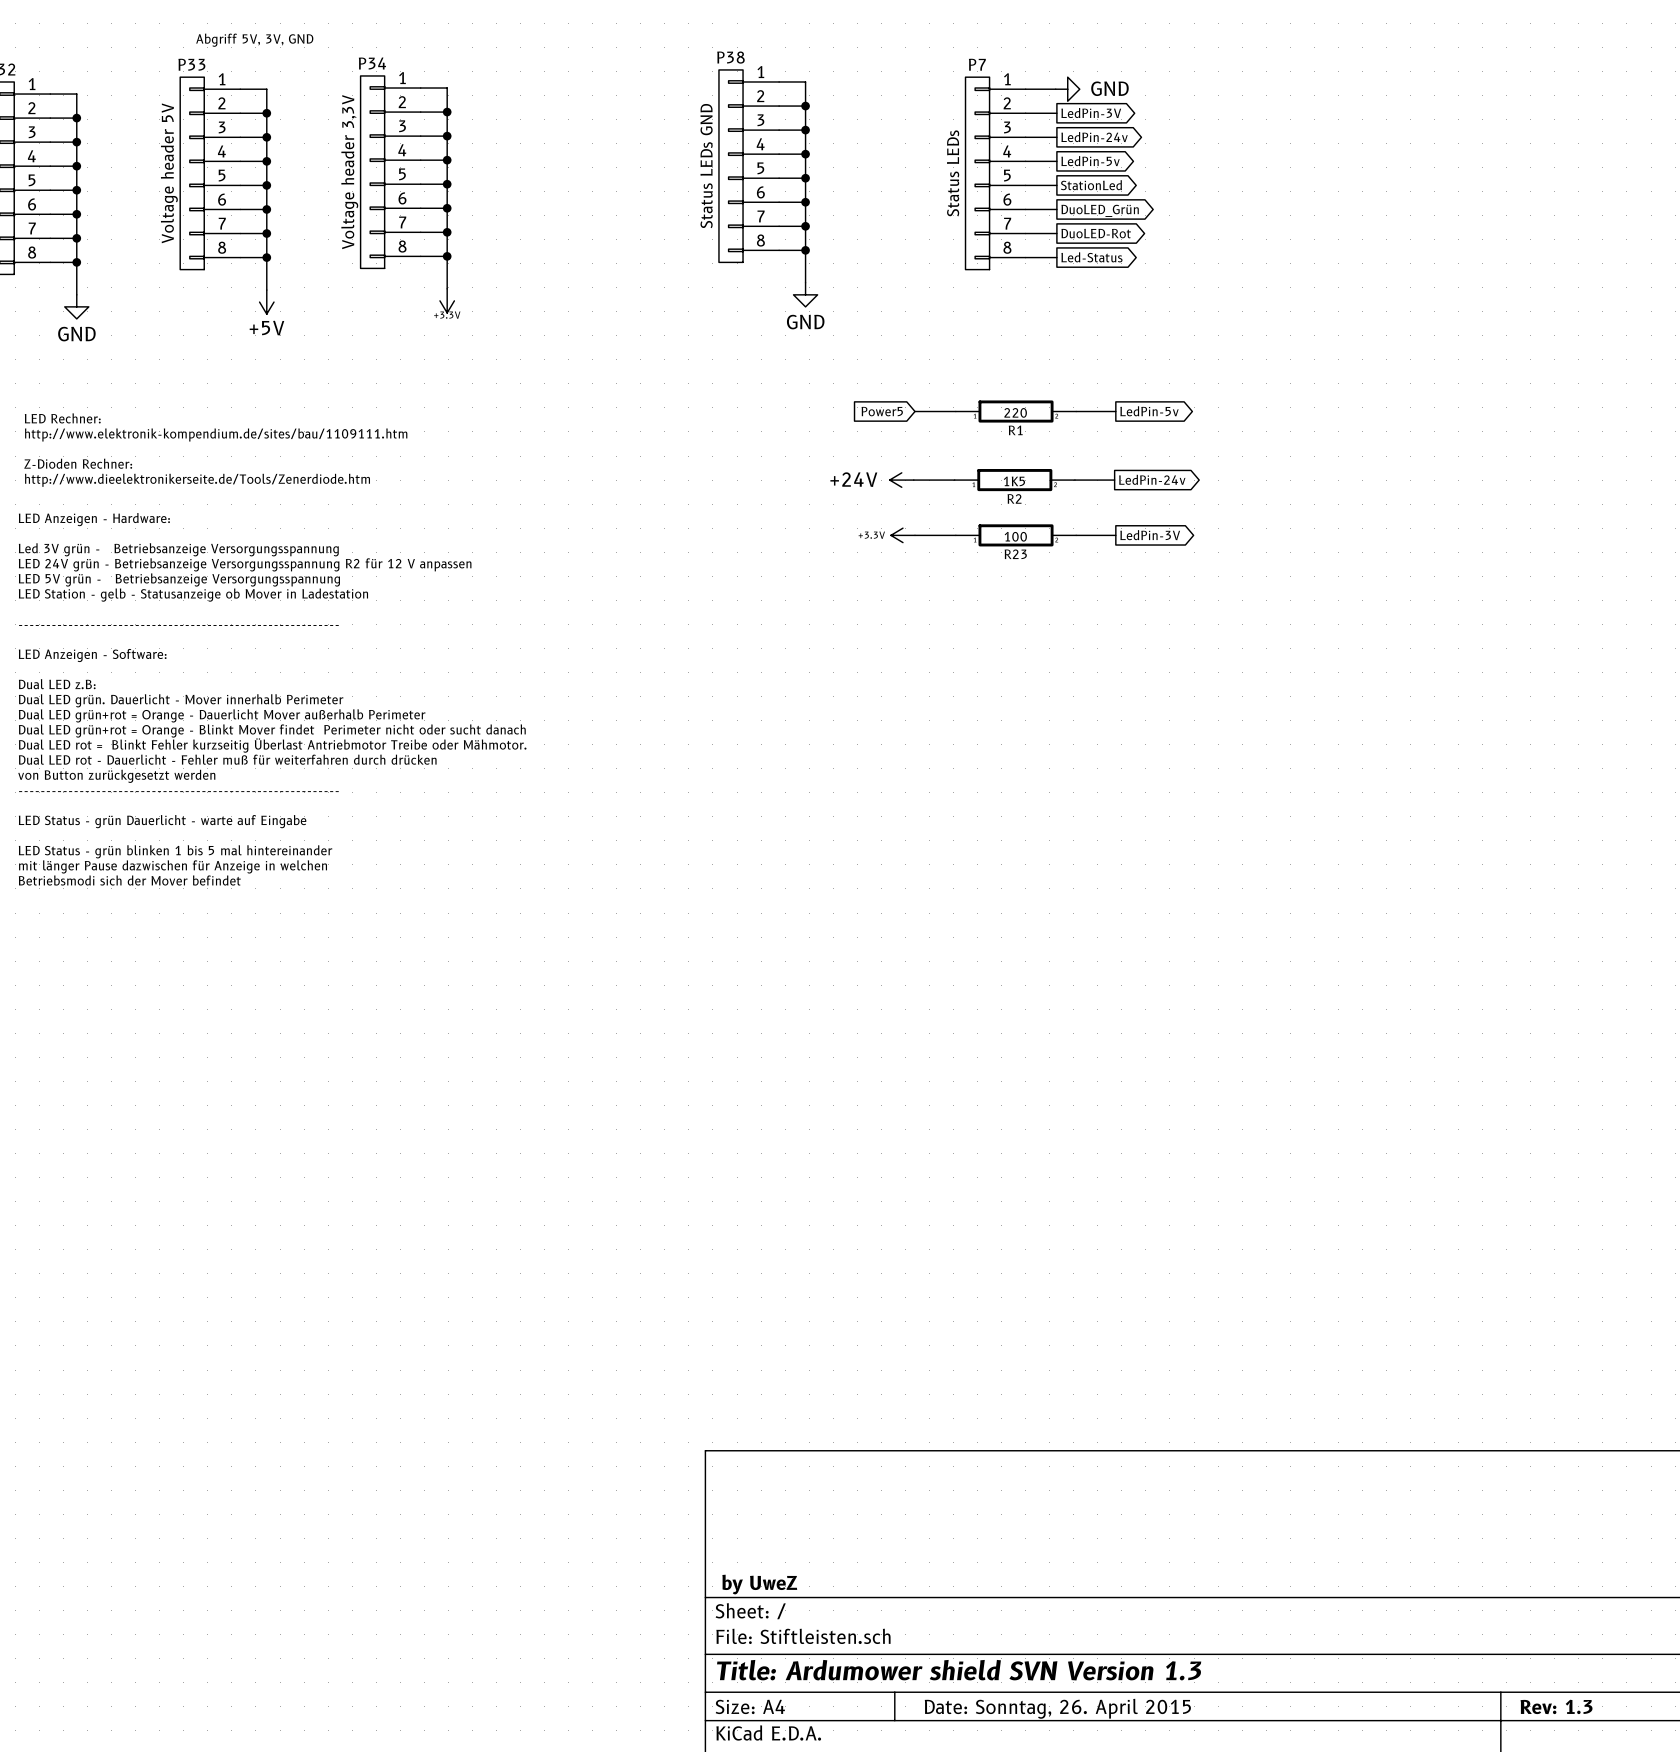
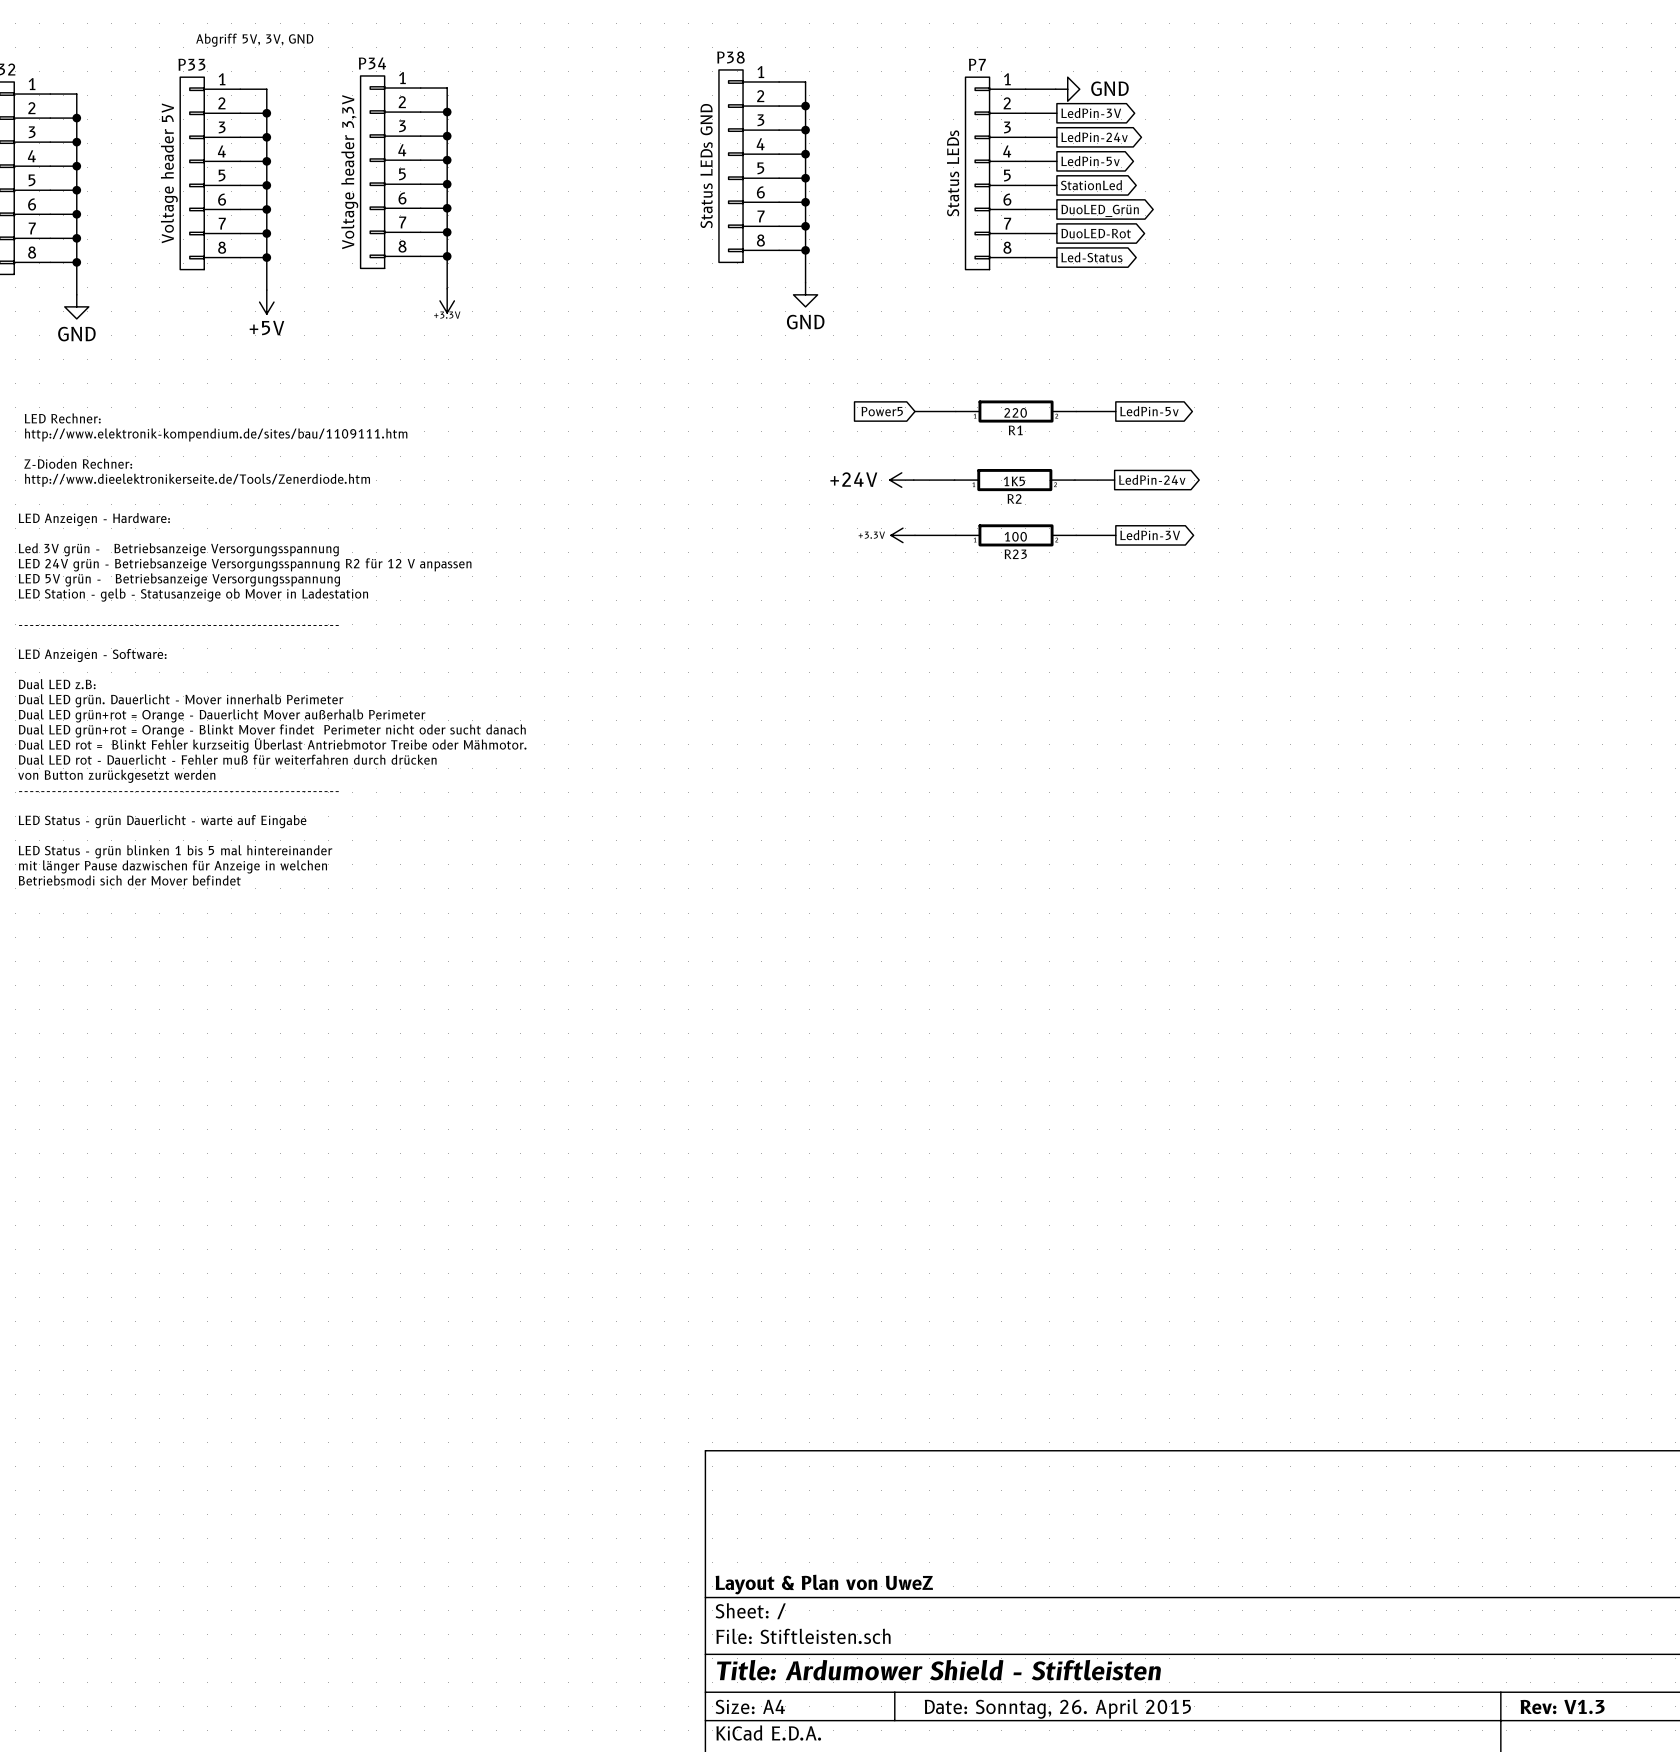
title block: by UweZ (759, 1584) -> Layout & Plan von UweZ (824, 1584)
title block: Title: Ardumower shield SVN Version 1.3 (959, 1670) -> Title: Ardumower Shield - Stiftleisten (938, 1670)
title block: Rev: 1.3 (1556, 1706) -> Rev: V1.3 (1562, 1706)

